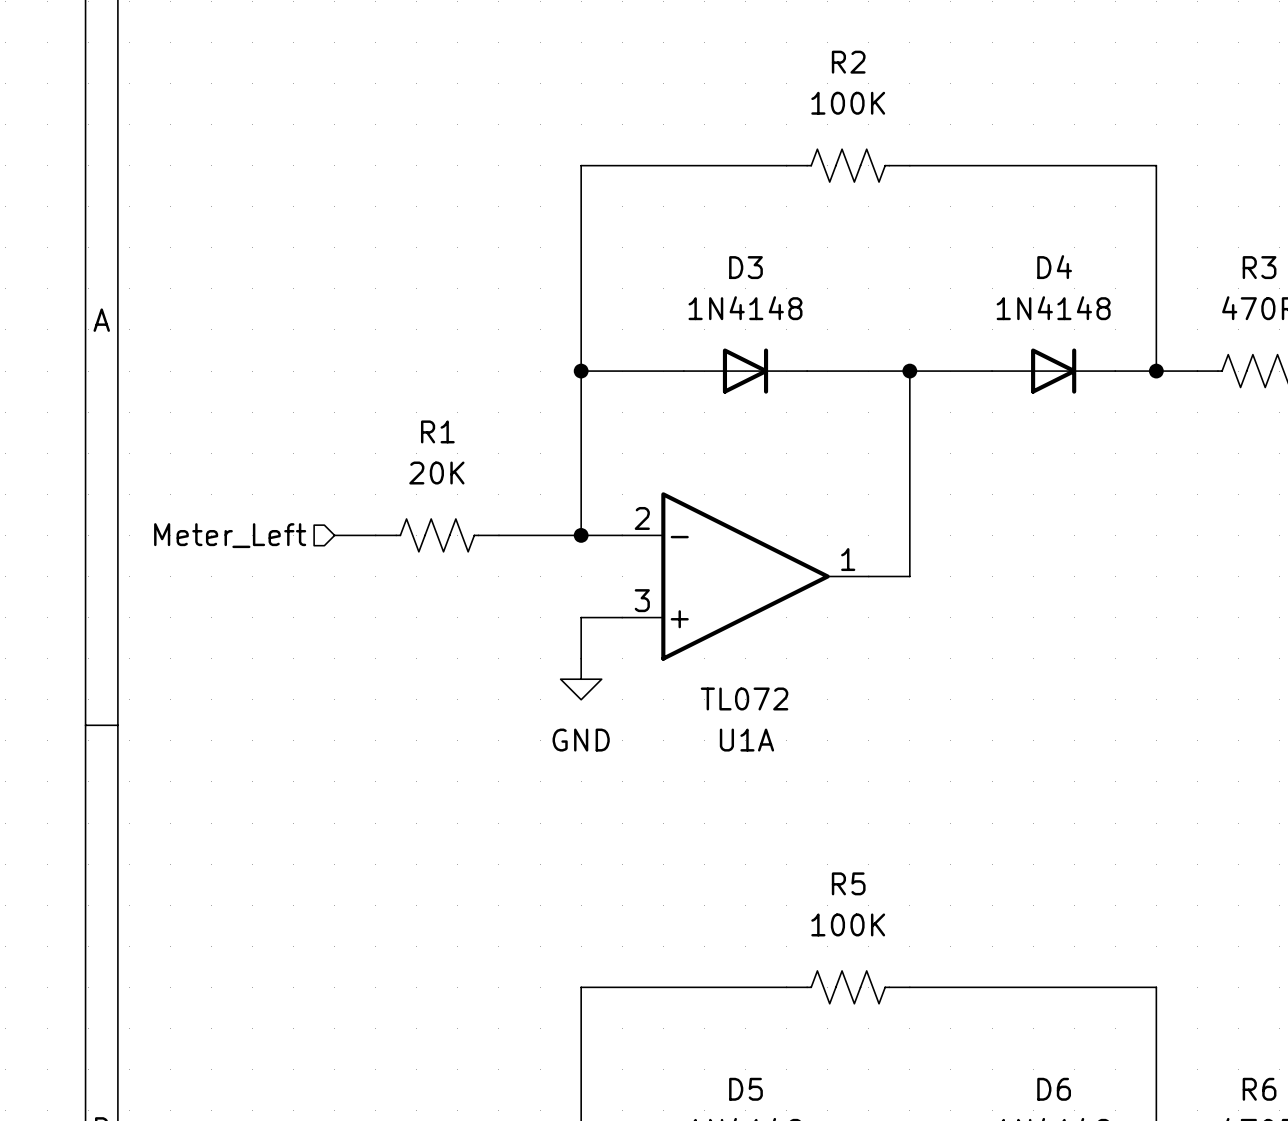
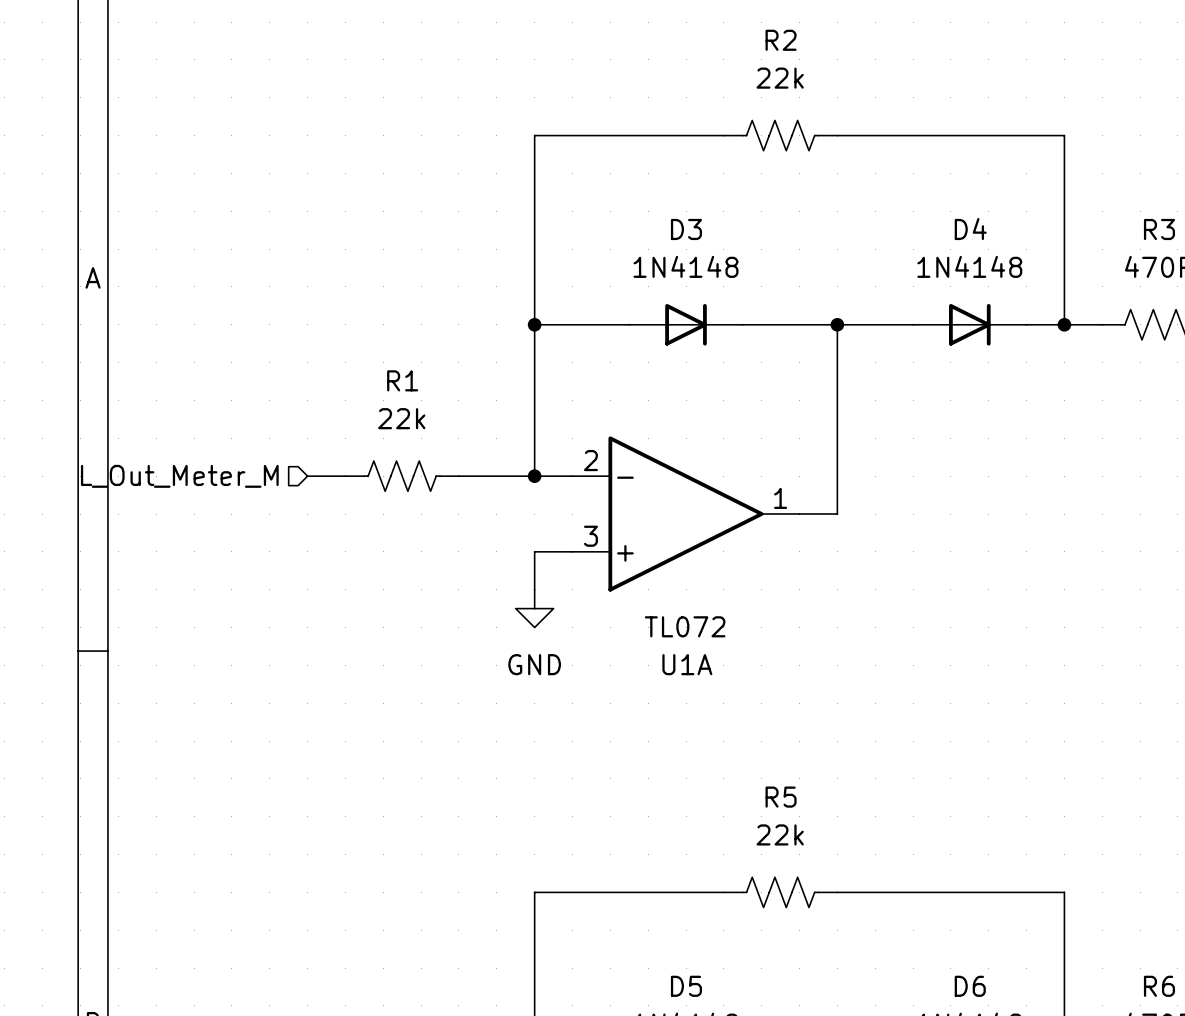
R2 value: 100K (848, 103) -> 22k (780, 78)
R1 value: 20K (436, 473) -> 22k (401, 418)
hierarchical label: Meter_Left (230, 535) -> L_Out_Meter_M (179, 476)
R5 value: 100K (848, 924) -> 22k (780, 834)

